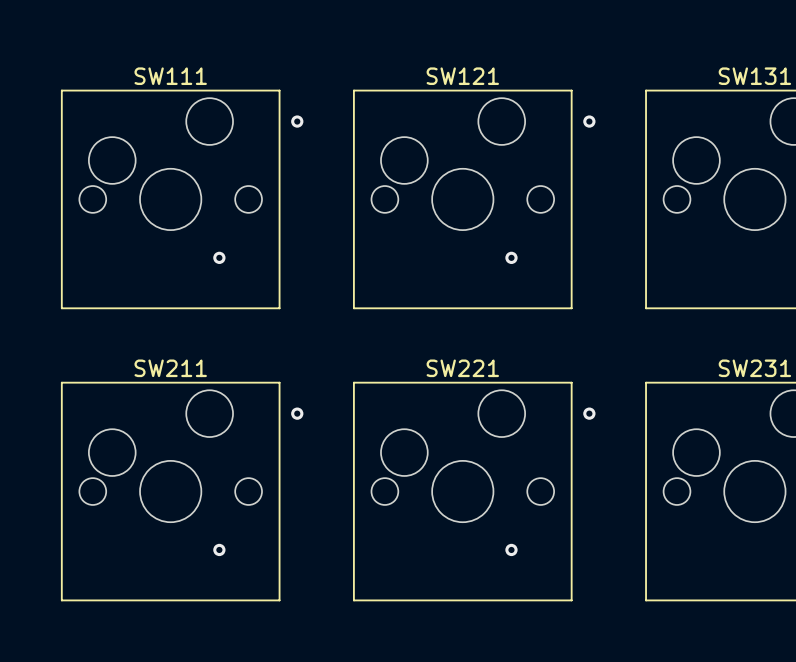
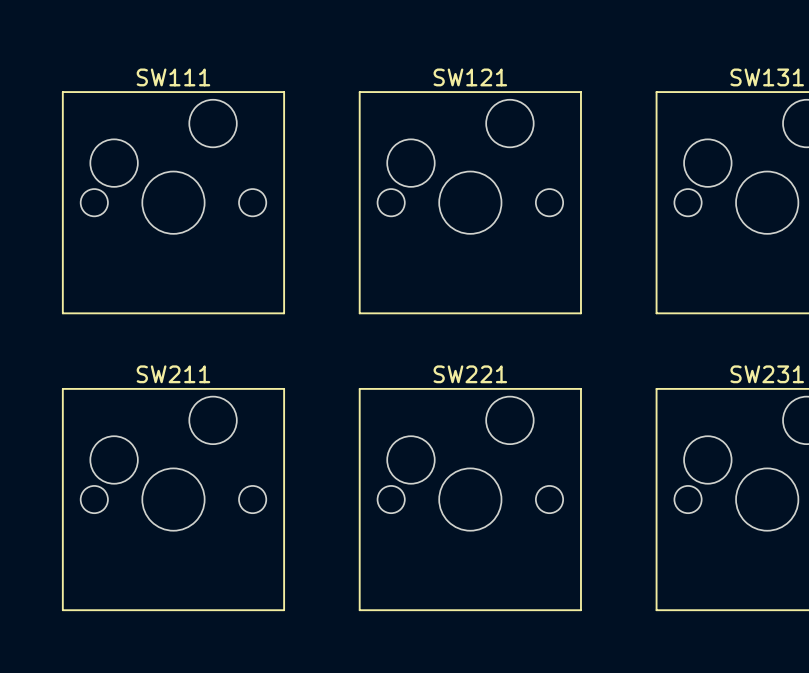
via: (297, 121) -> none
via: (589, 121) -> none
via: (219, 257) -> none
via: (511, 257) -> none
via: (297, 413) -> none
via: (589, 413) -> none
via: (219, 549) -> none
via: (511, 549) -> none

